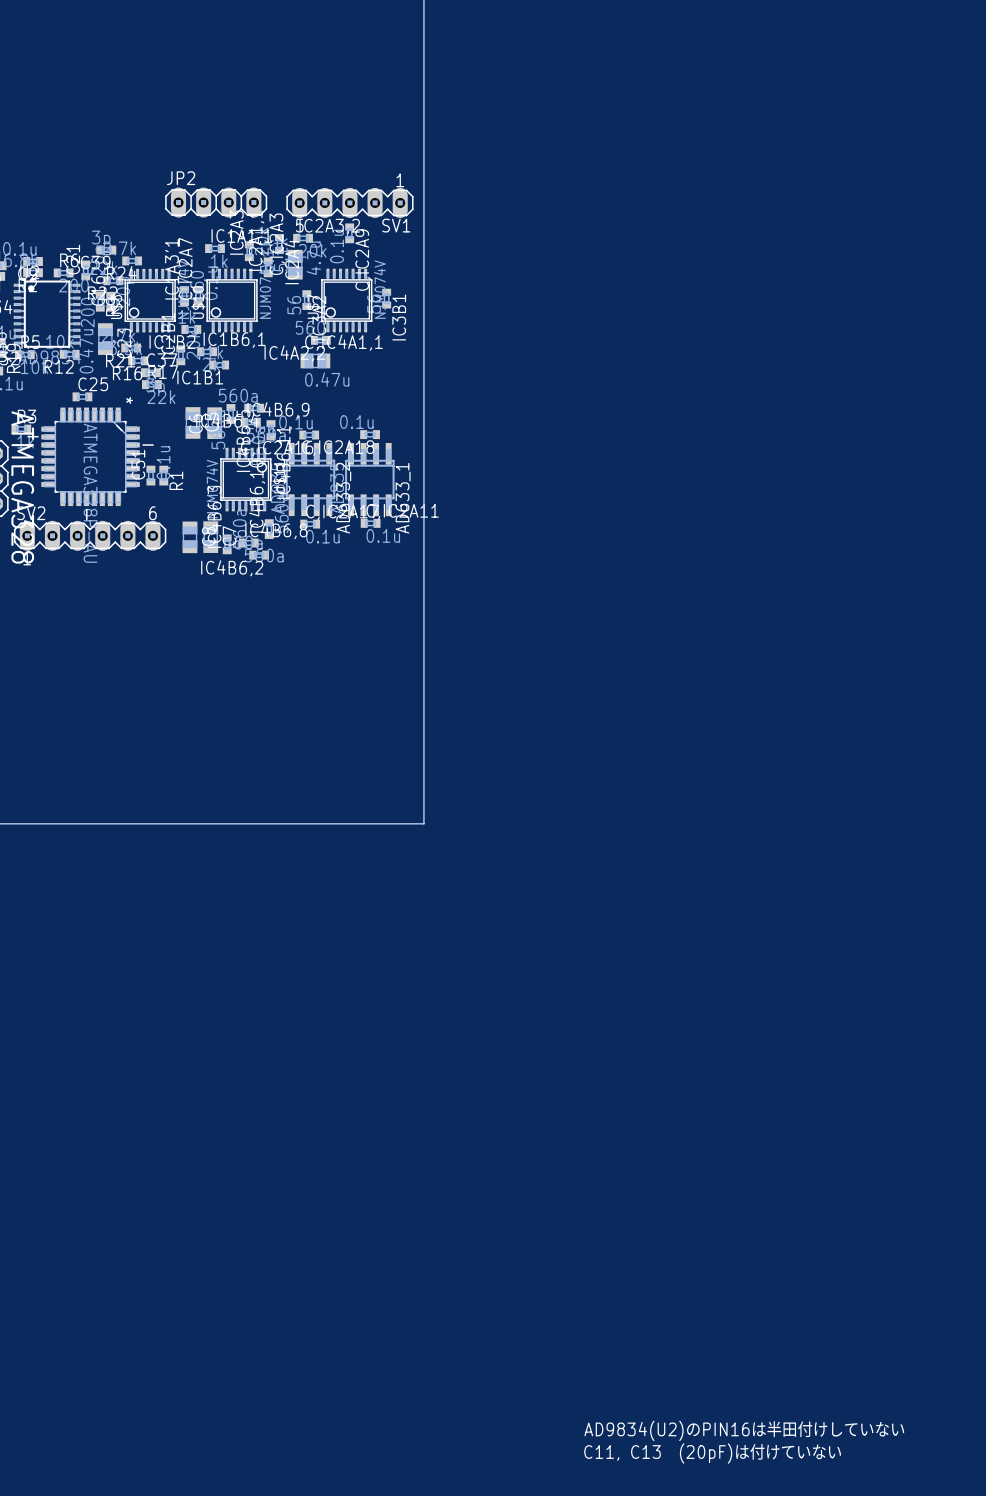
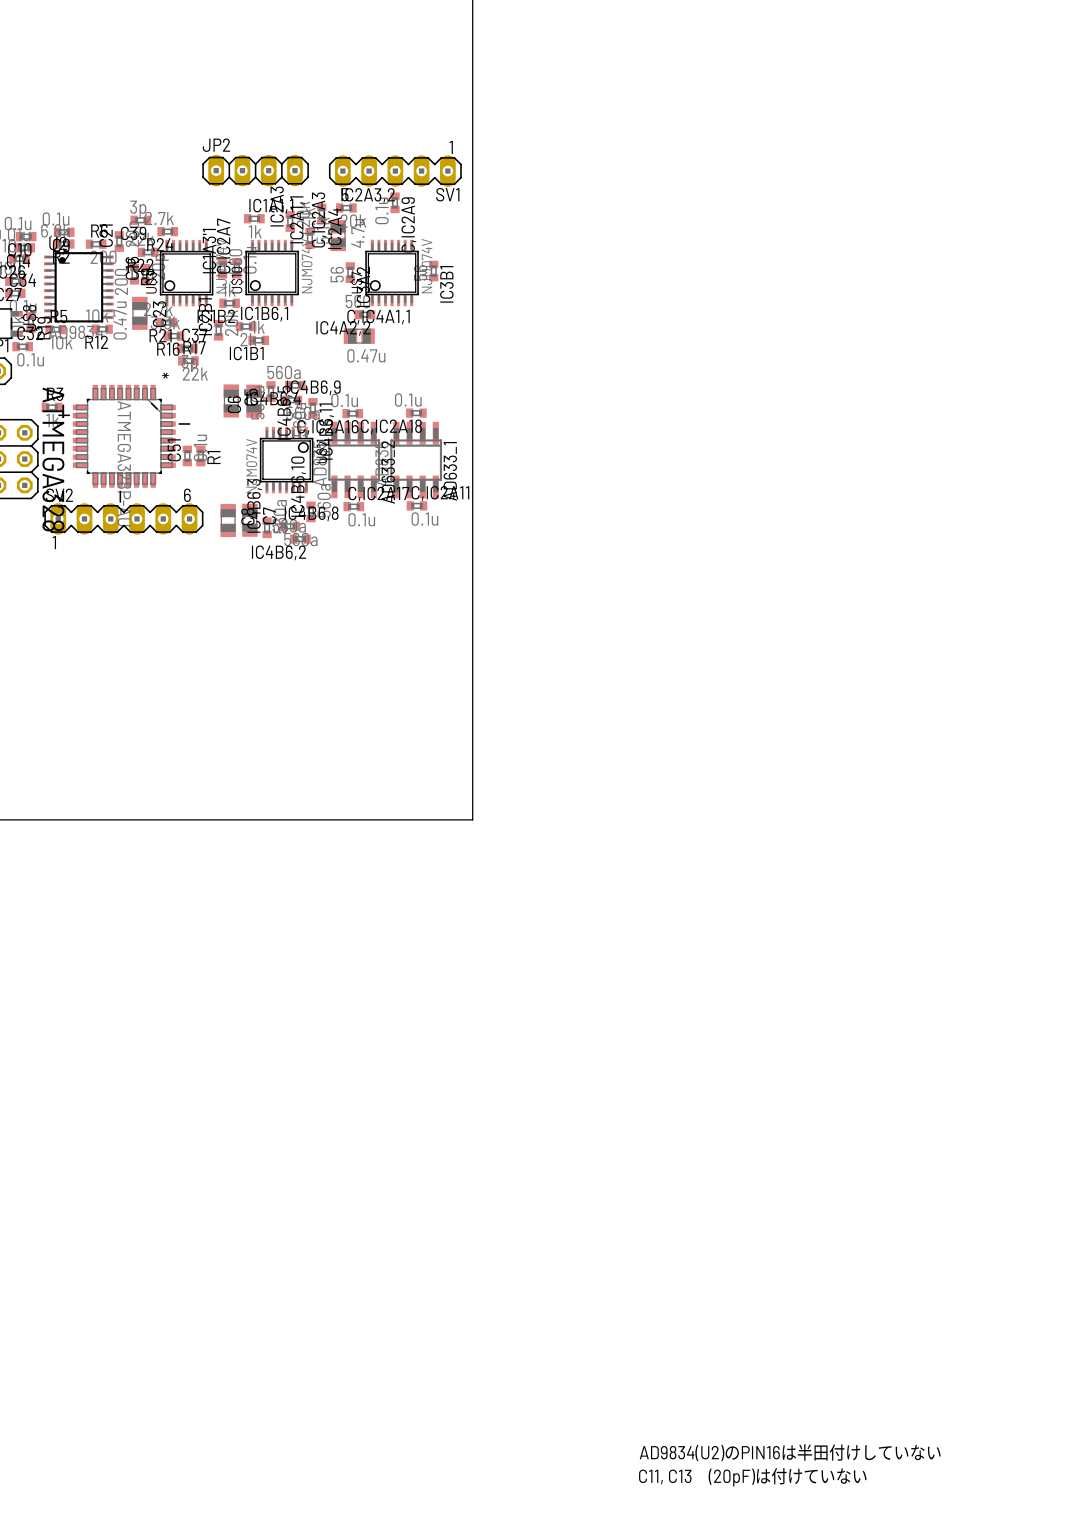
C25: (82, 396) -> none

